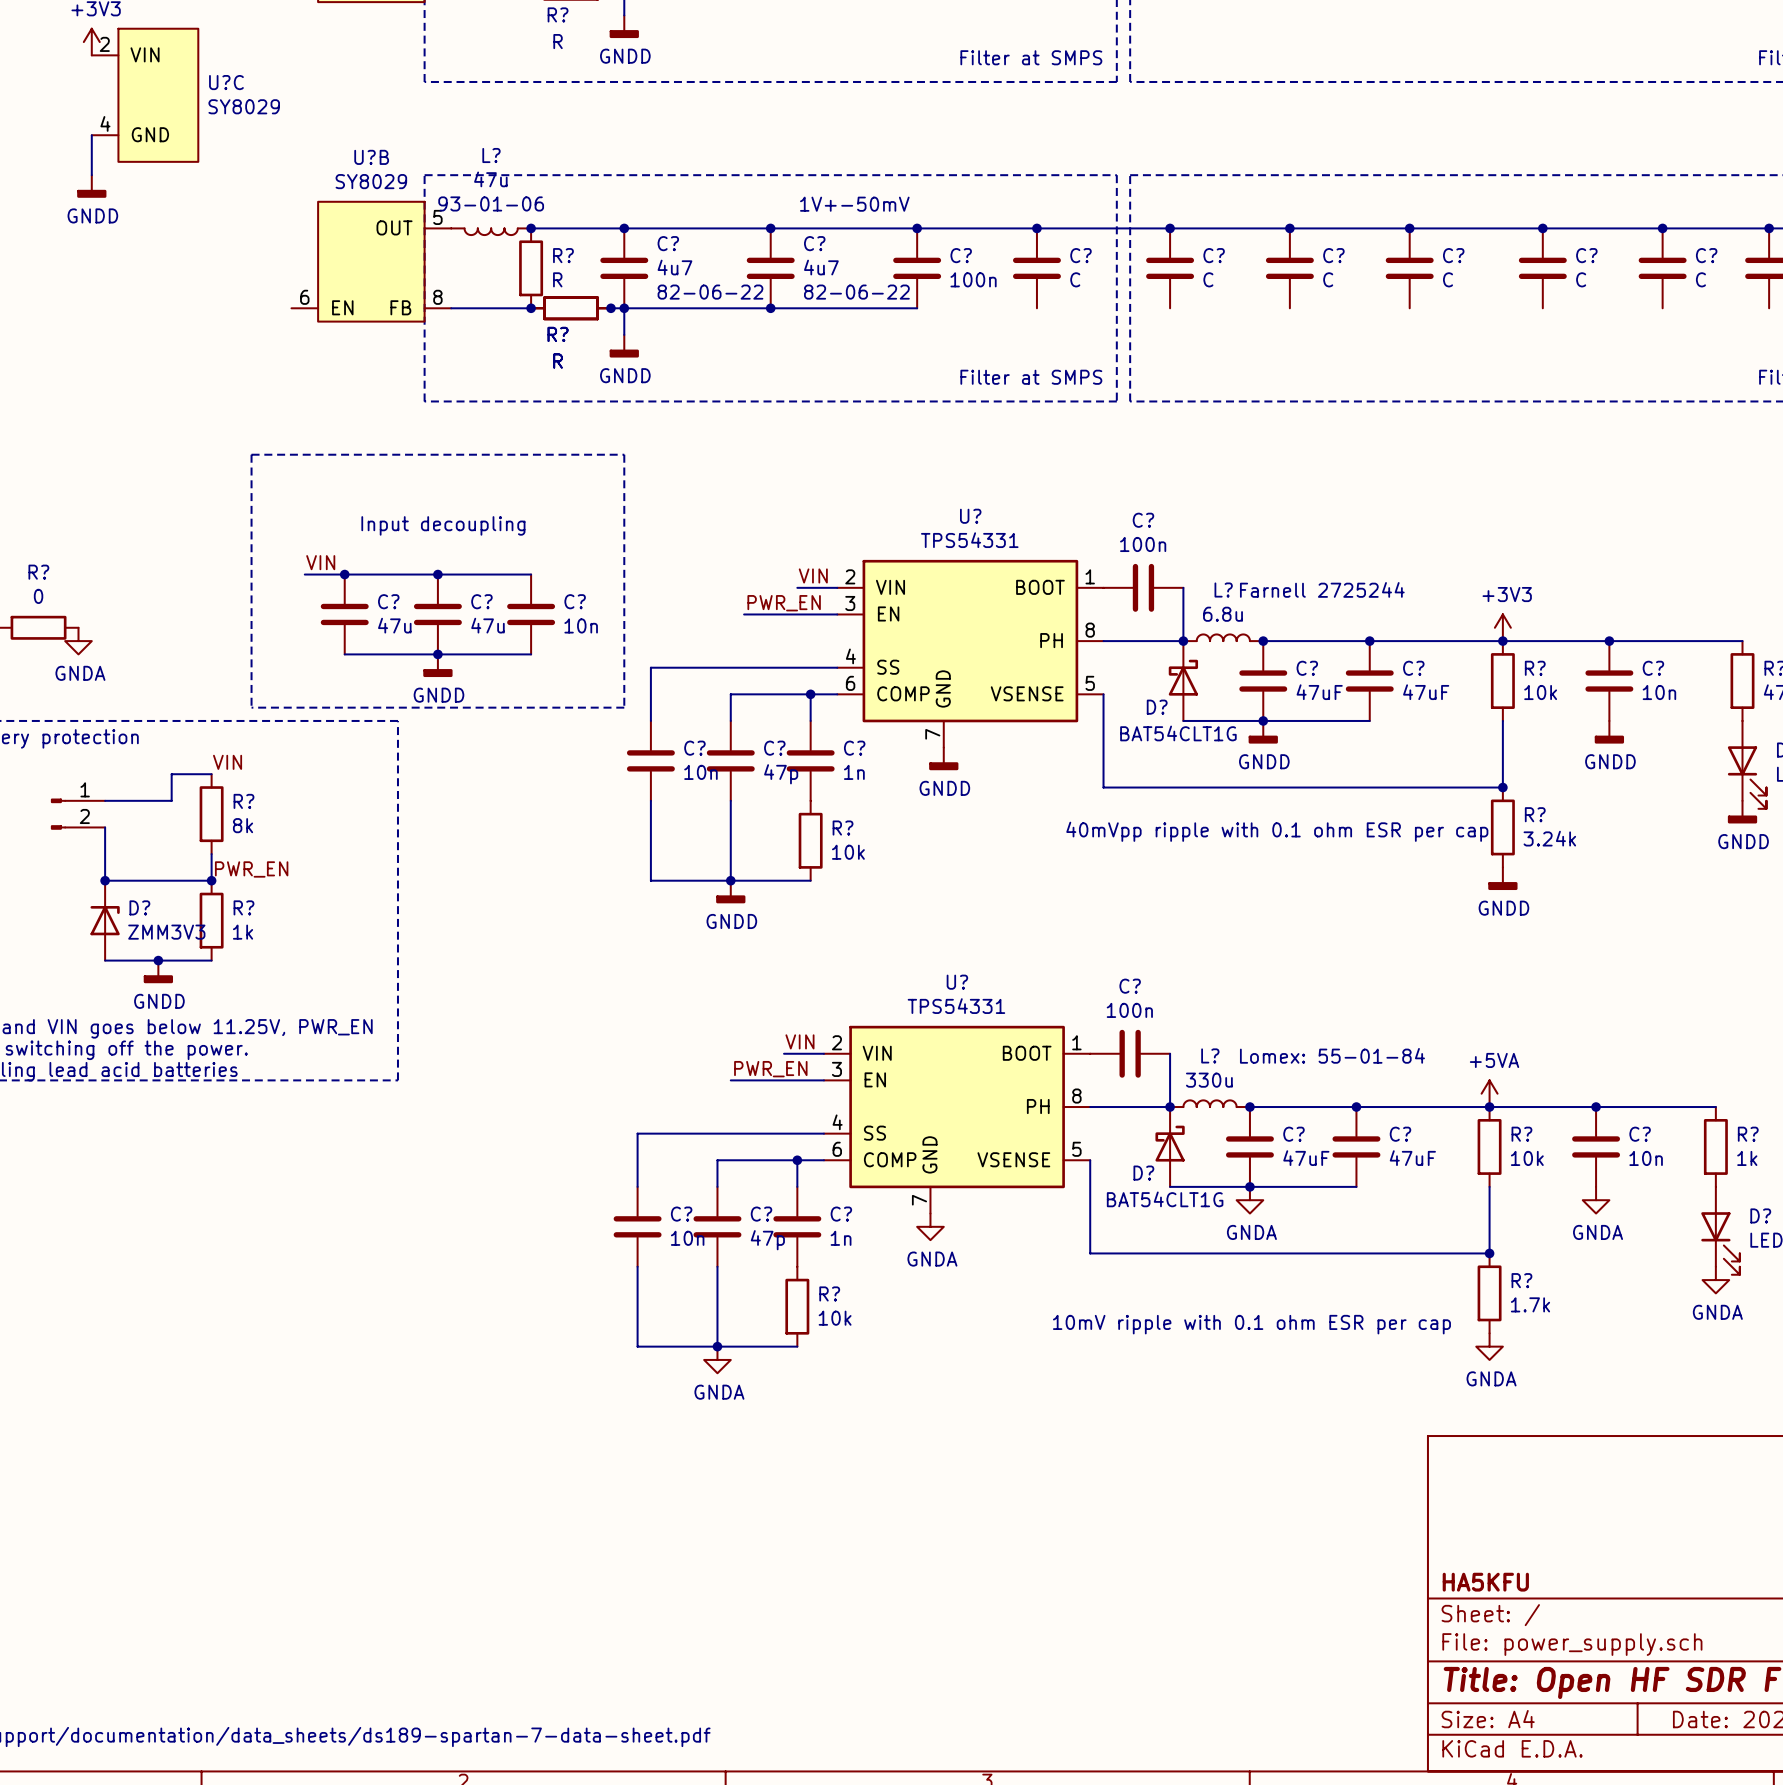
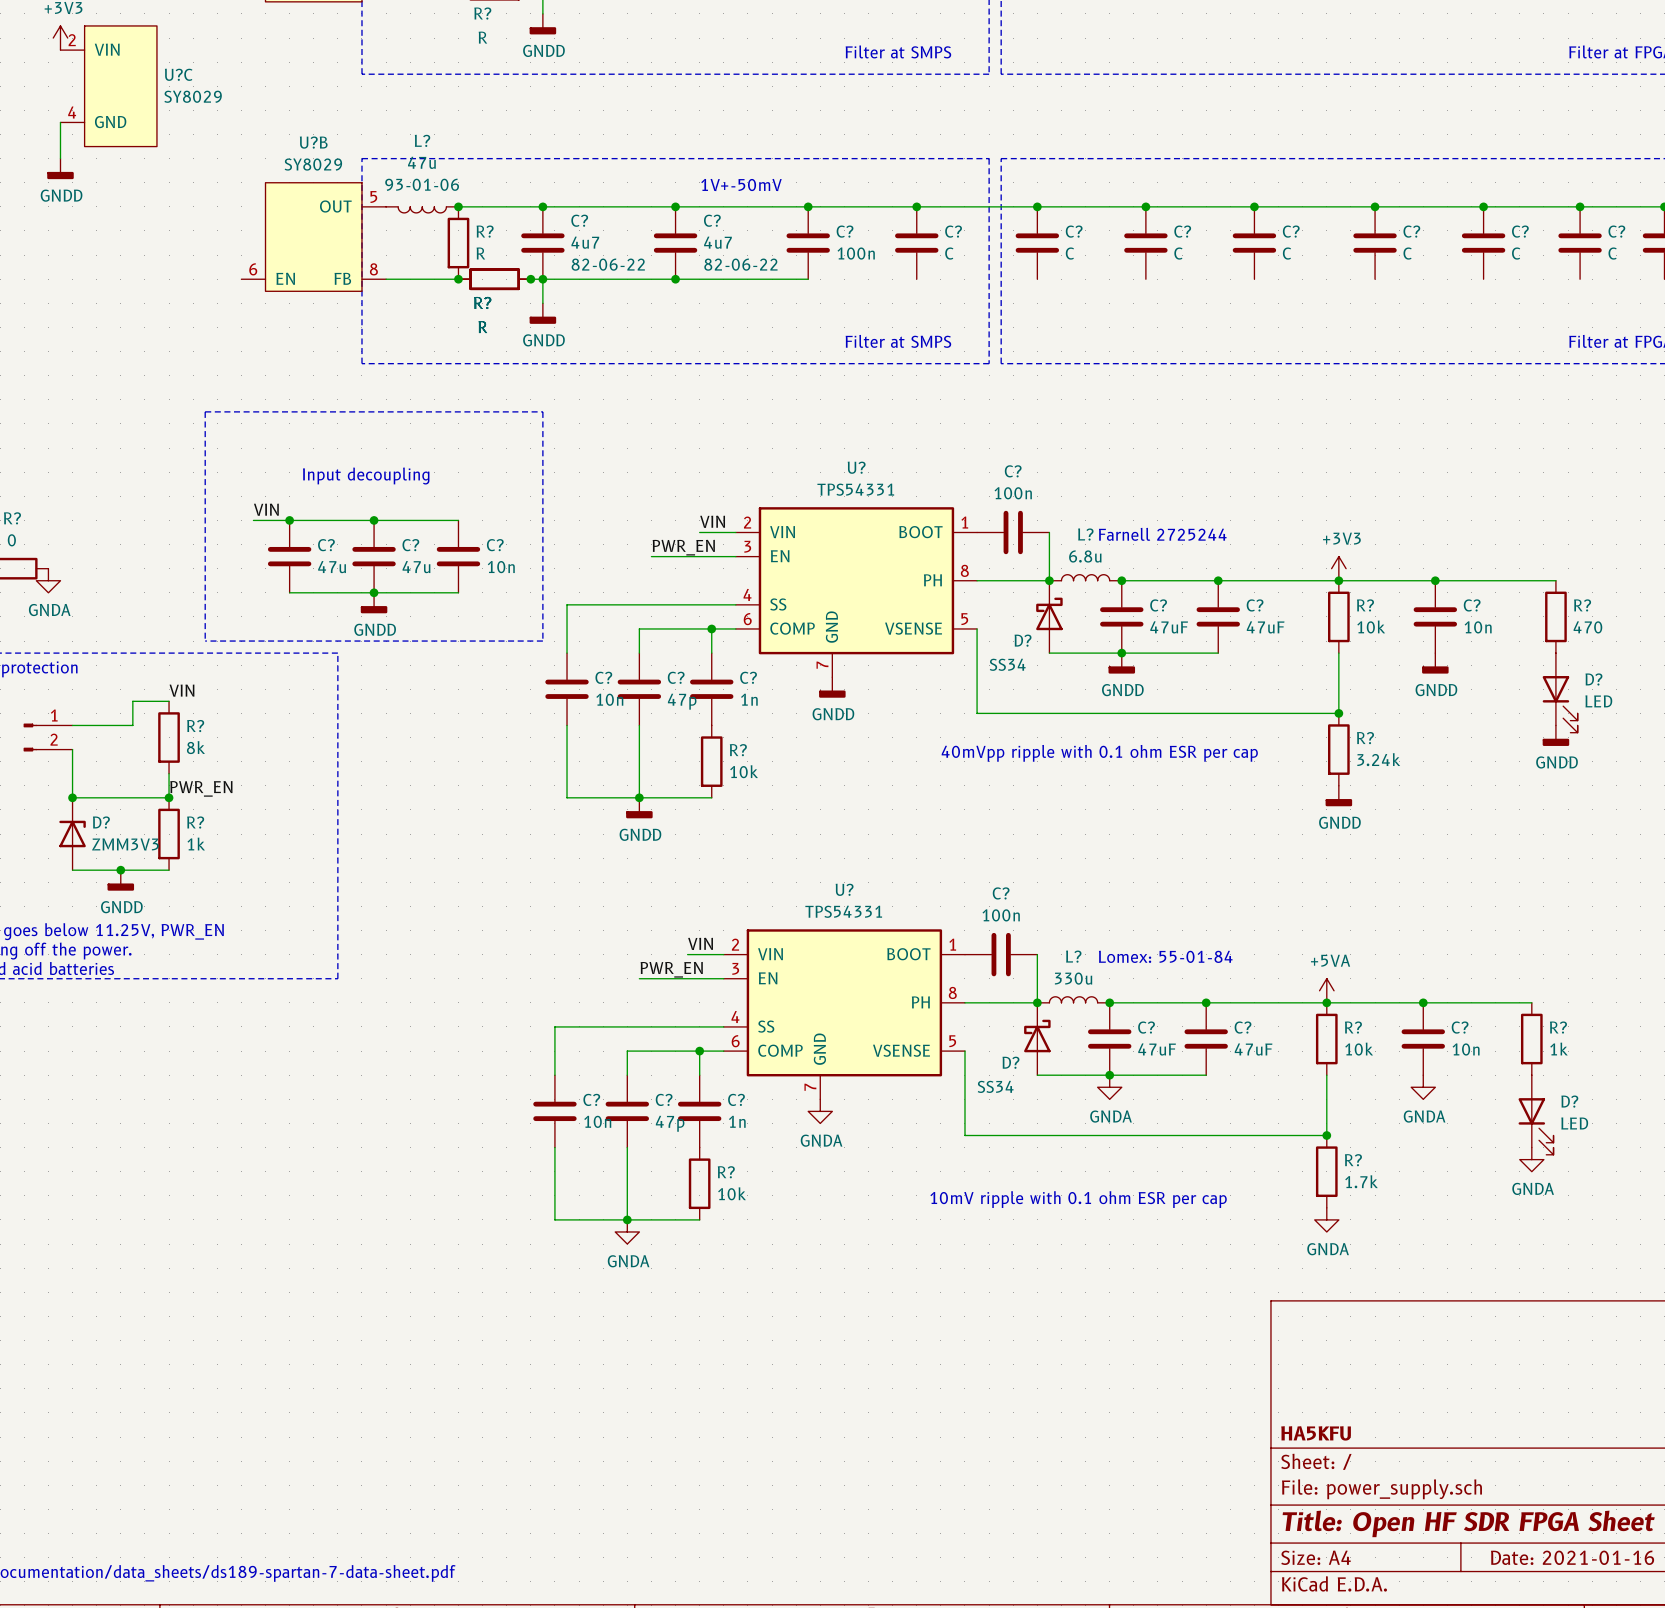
D? value: BAT54CLT1G (1178, 733) -> SS34 (1007, 664)
D? value: BAT54CLT1G (1165, 1199) -> SS34 (995, 1086)

